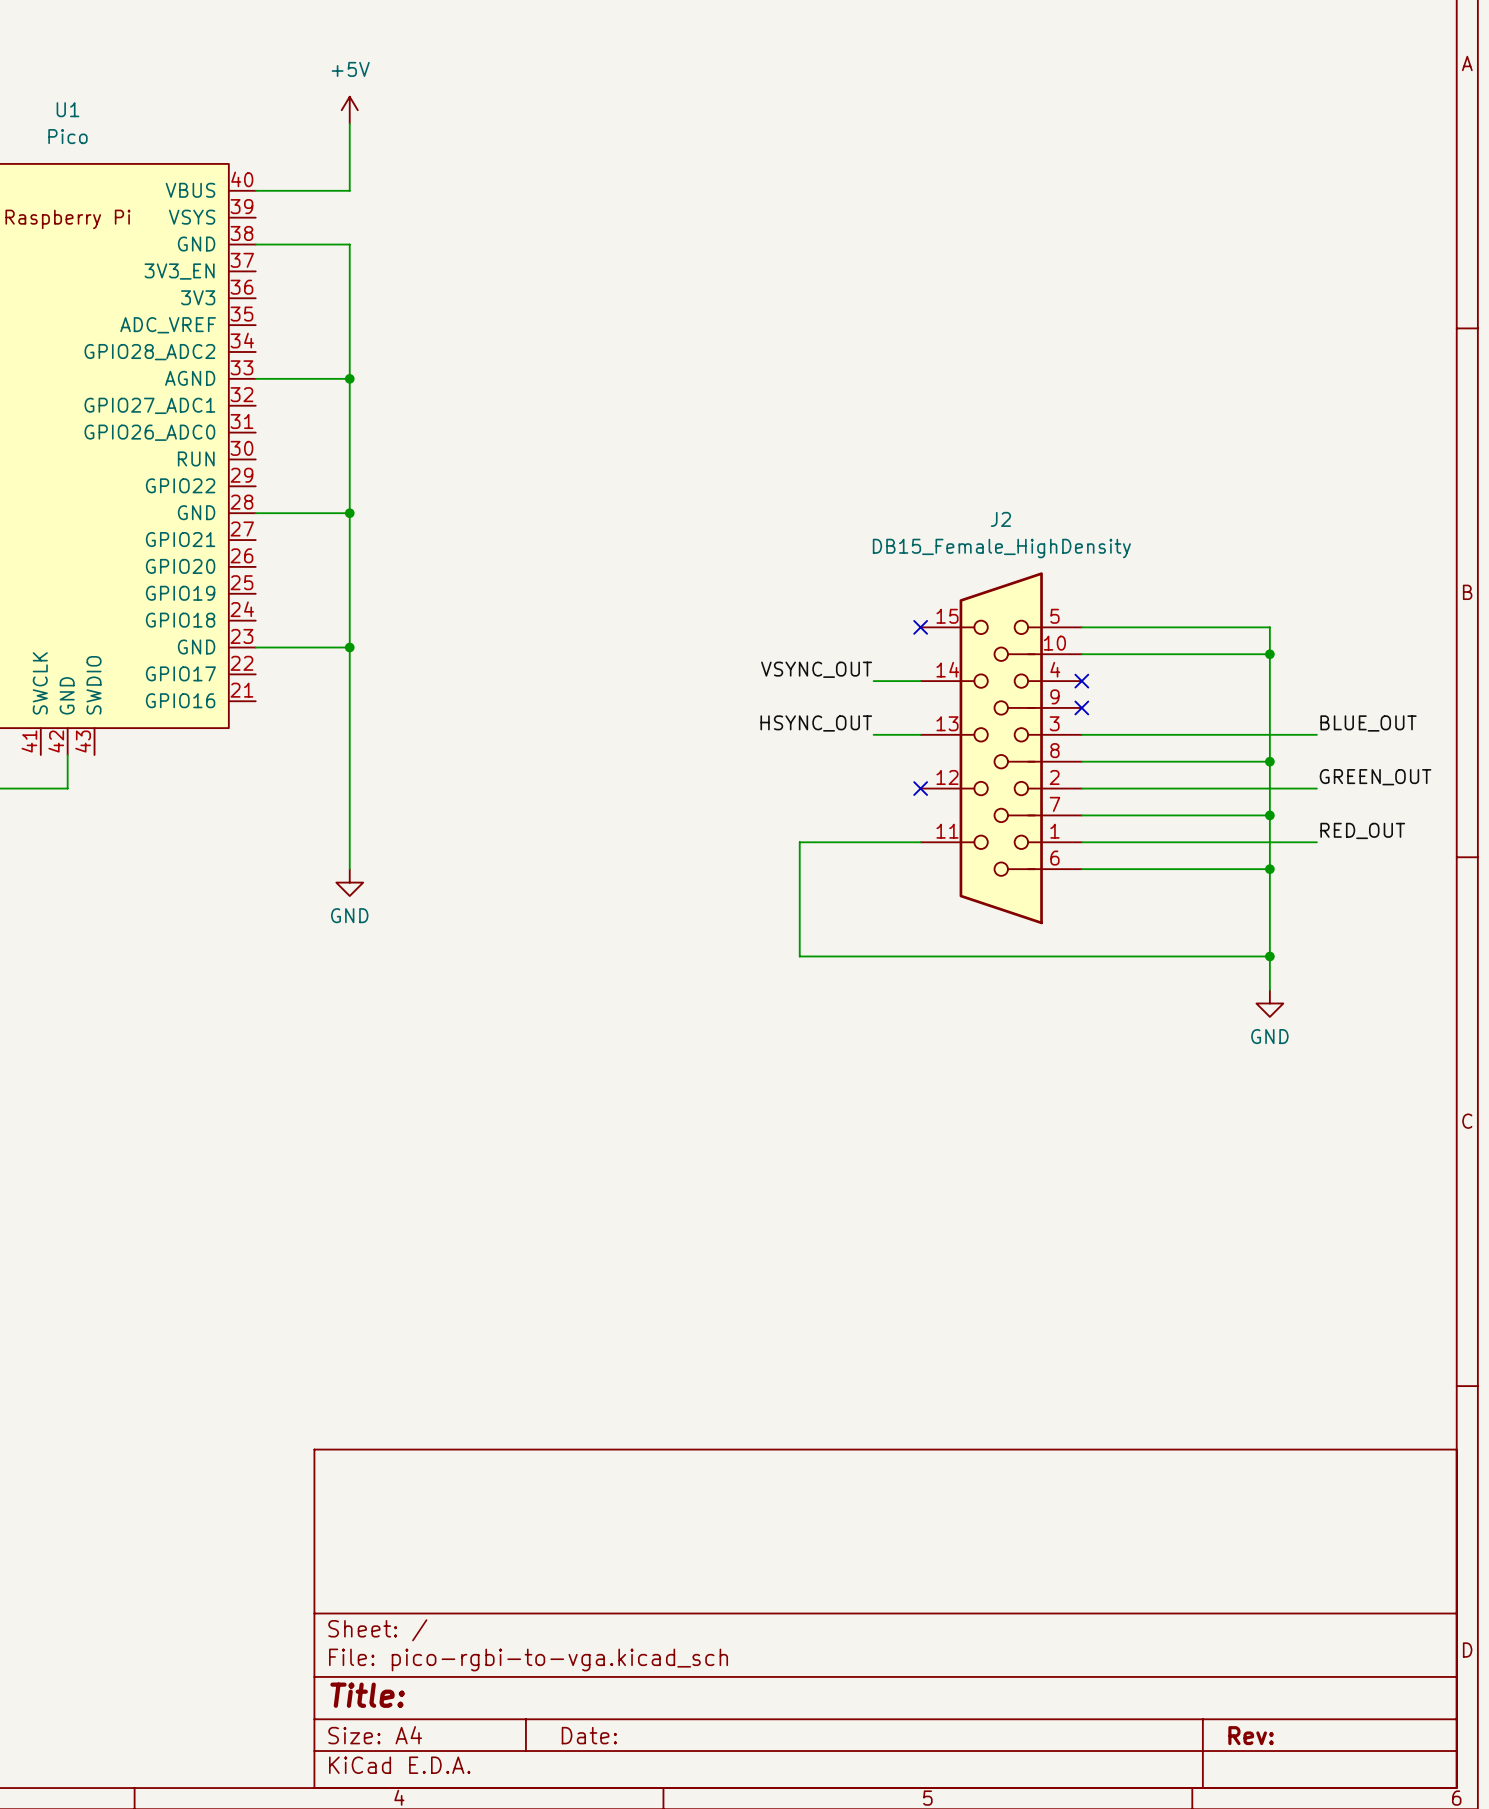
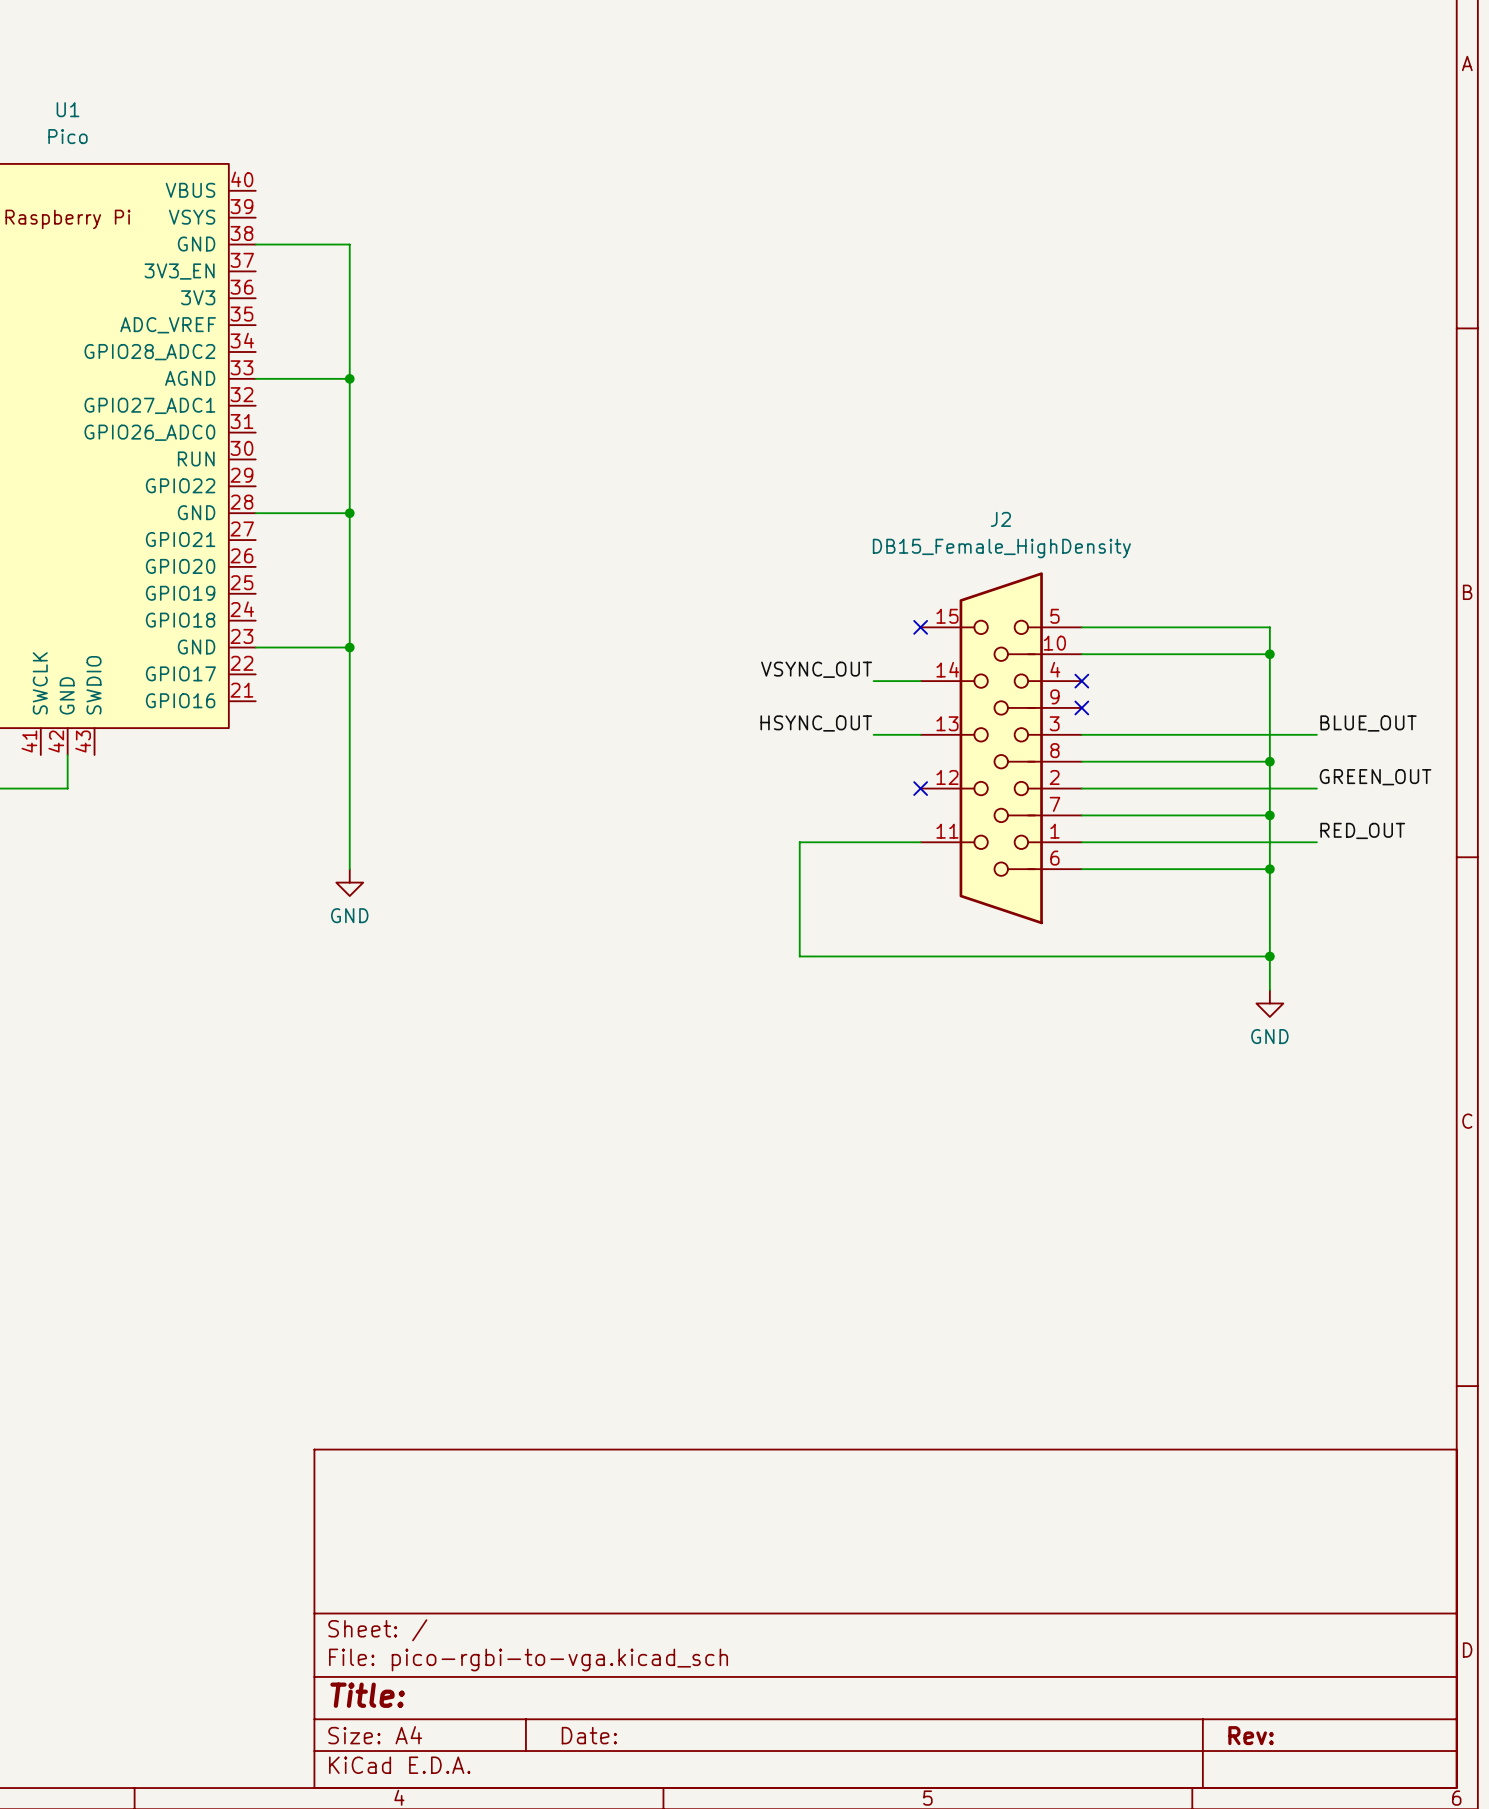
power symbol: +5V (349, 110) -> none
wire: (349, 123) (349, 190) (255, 190) -> none

